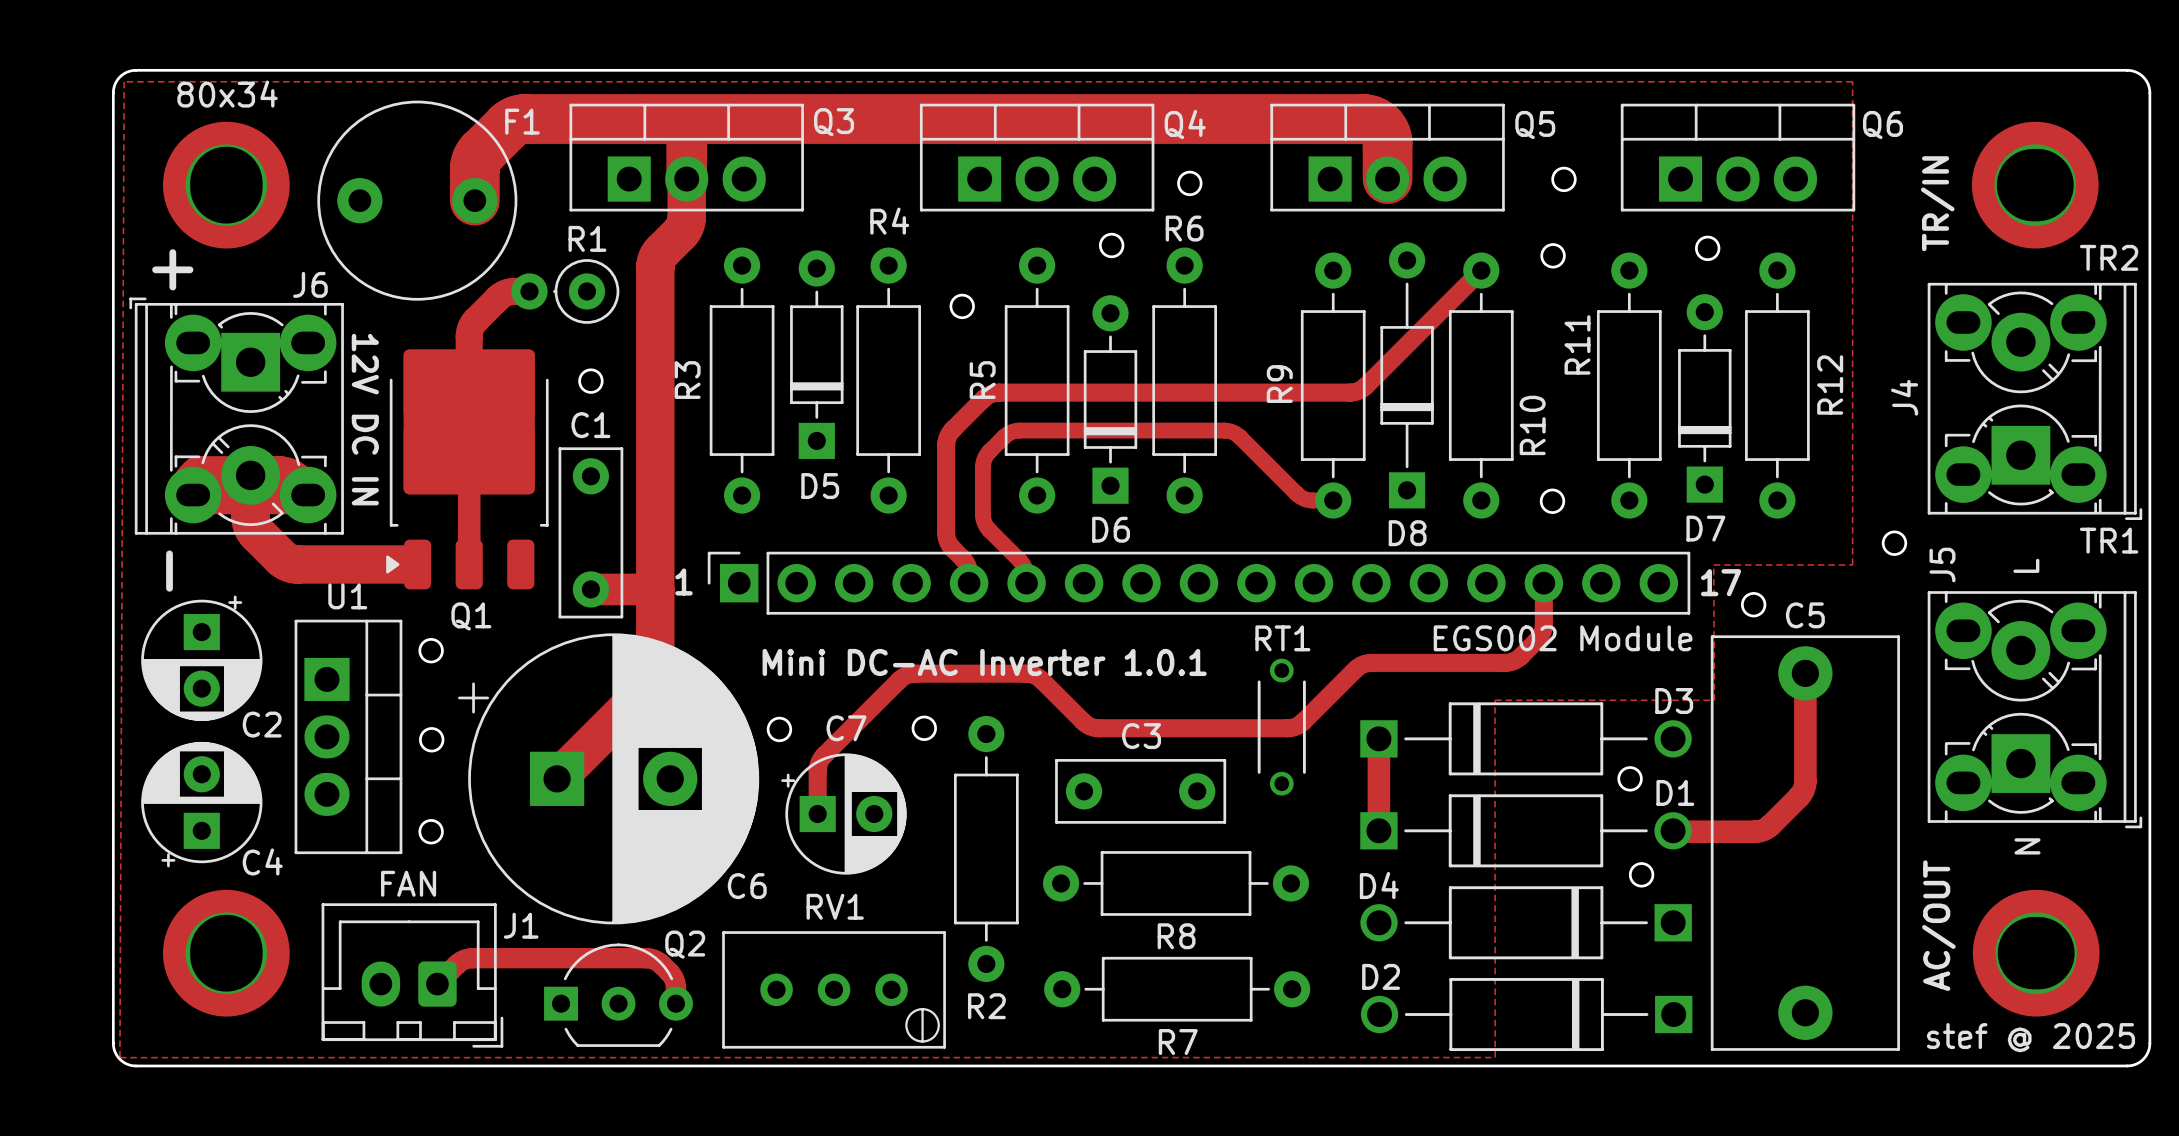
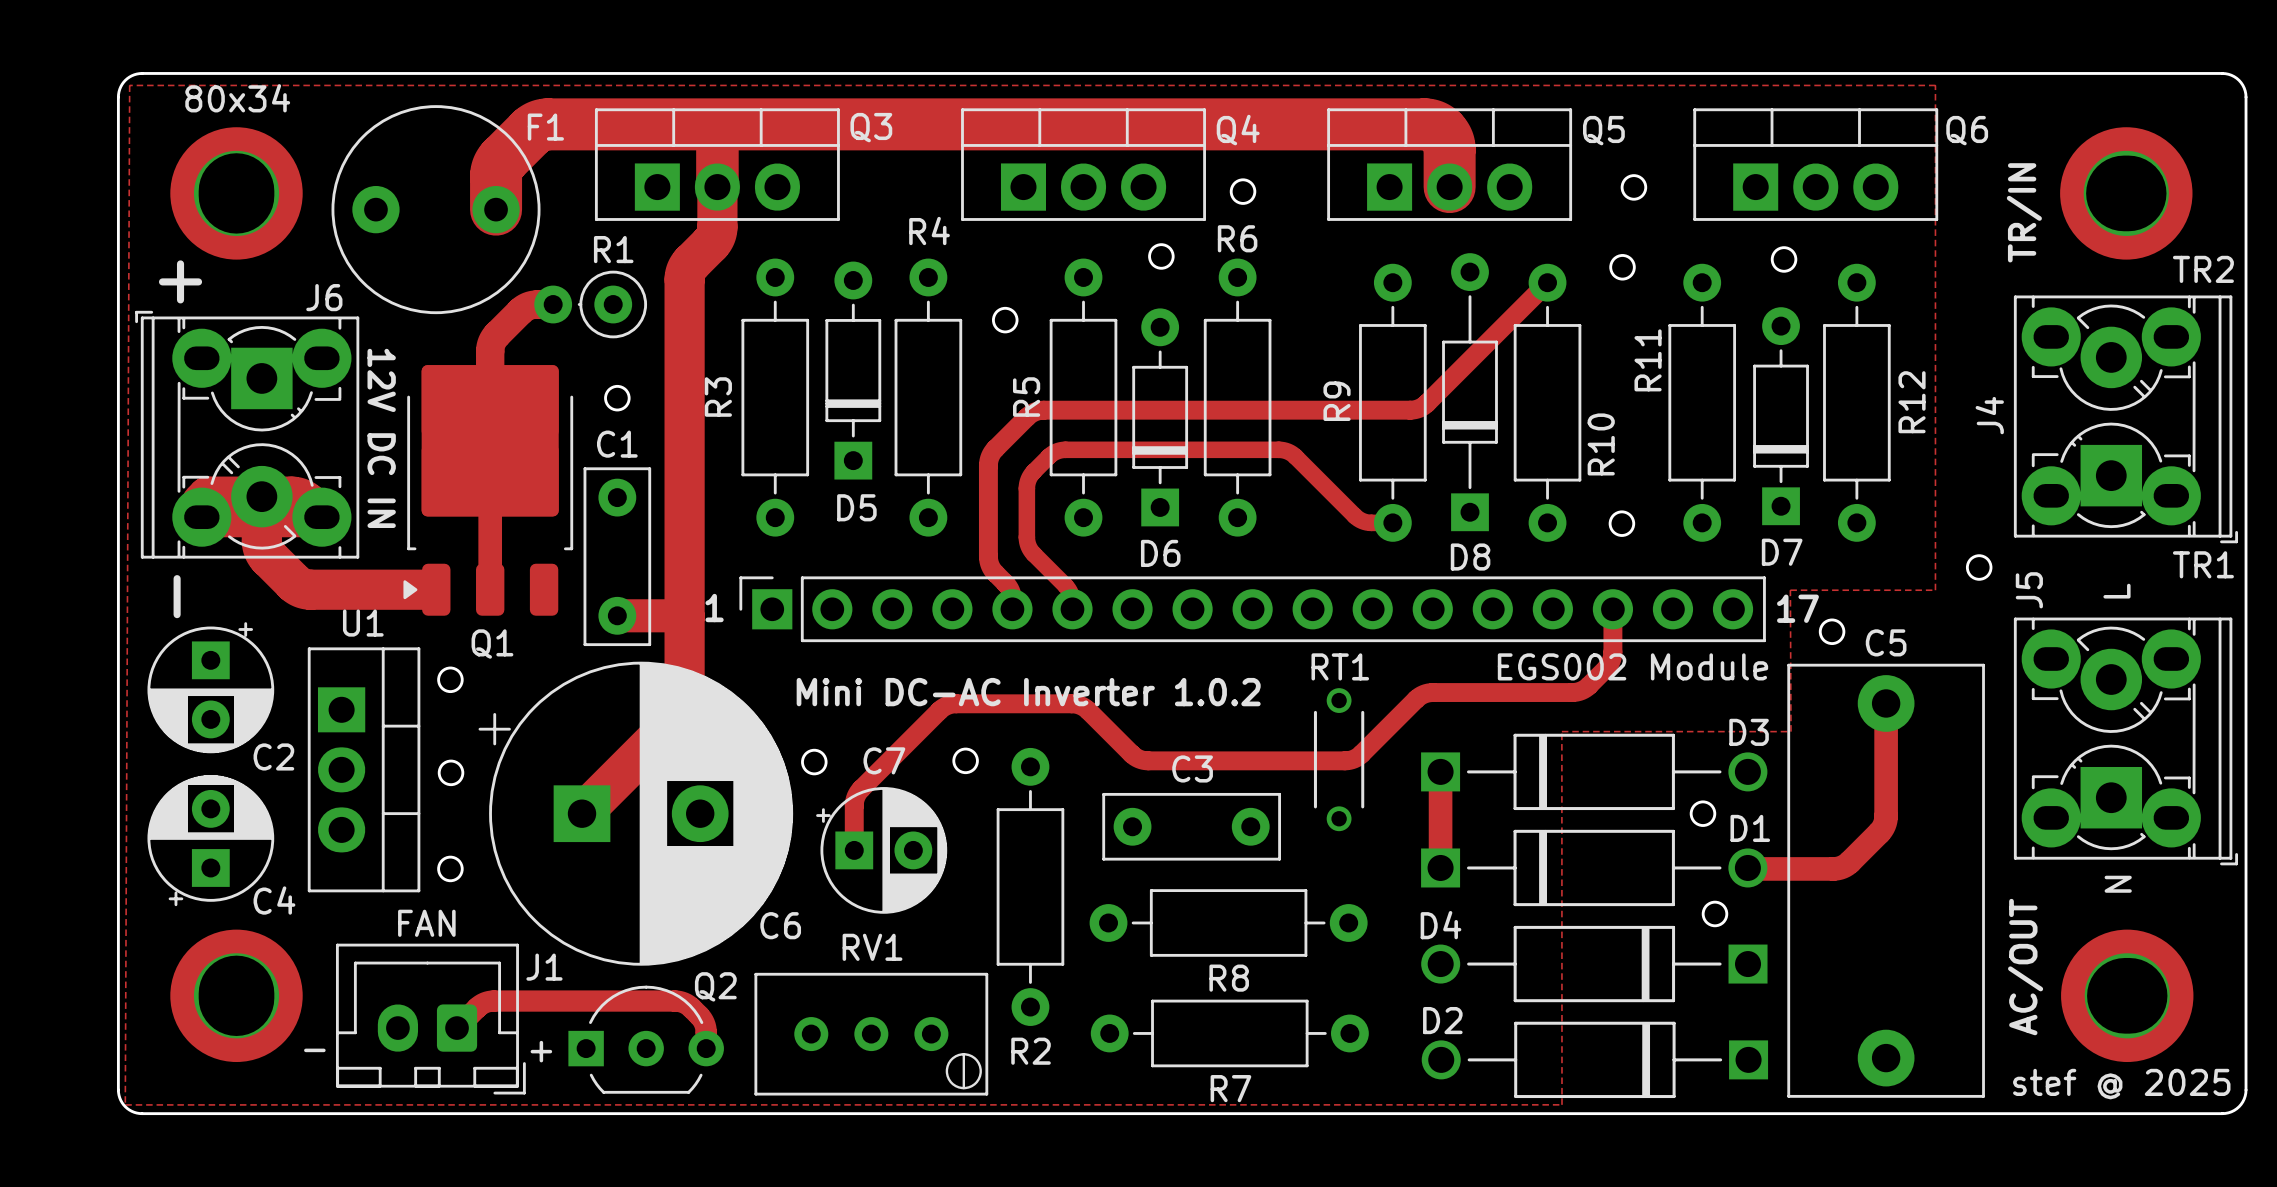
text: Mini DC-AC Inverter 1.0.1 (984, 662) -> Mini DC-AC Inverter 1.0.2 (1028, 692)
text: none -> - (314, 1050)
text: none -> + (541, 1051)

